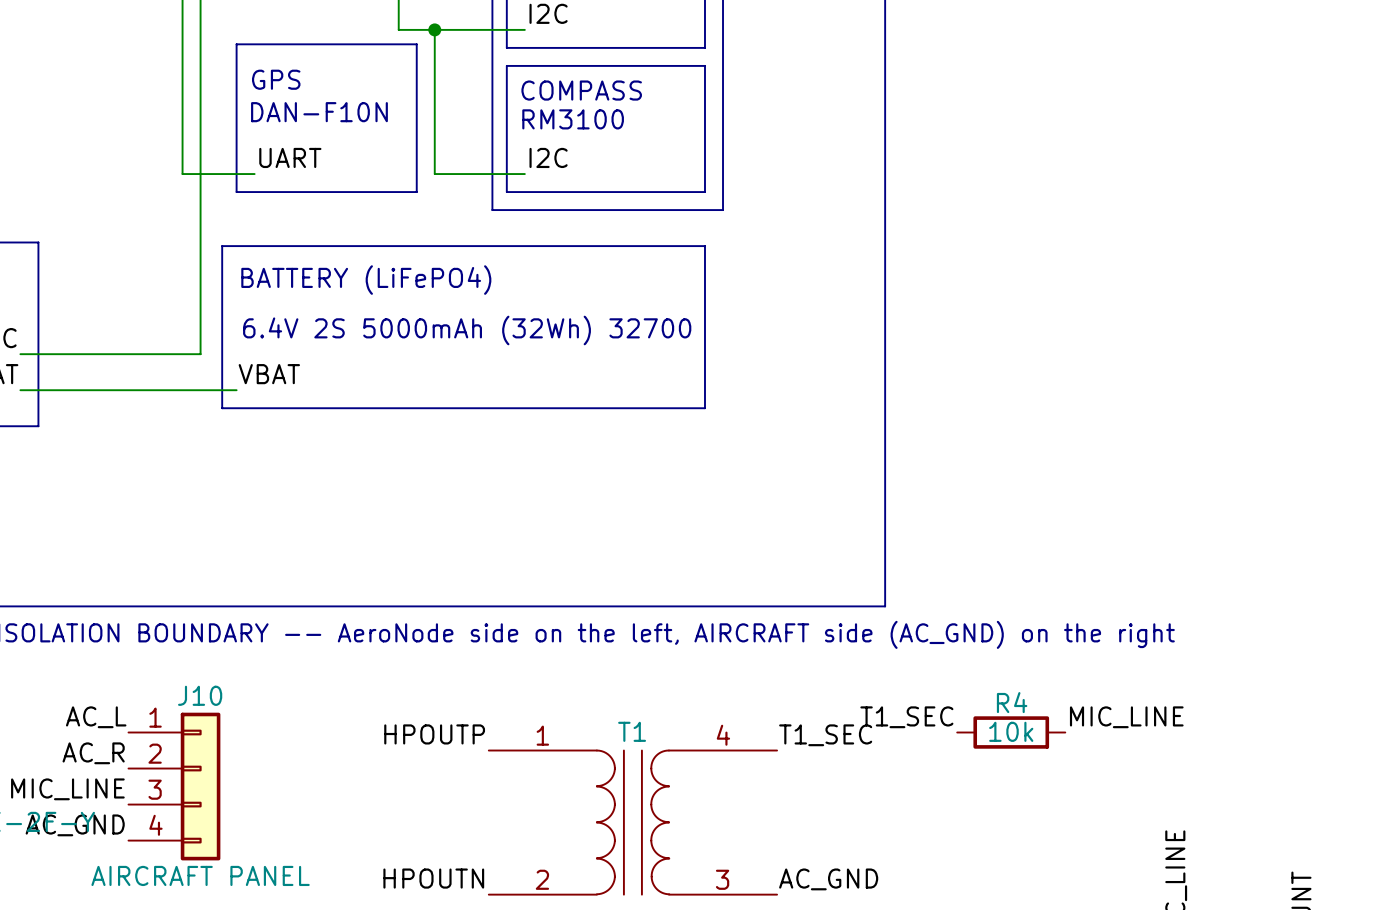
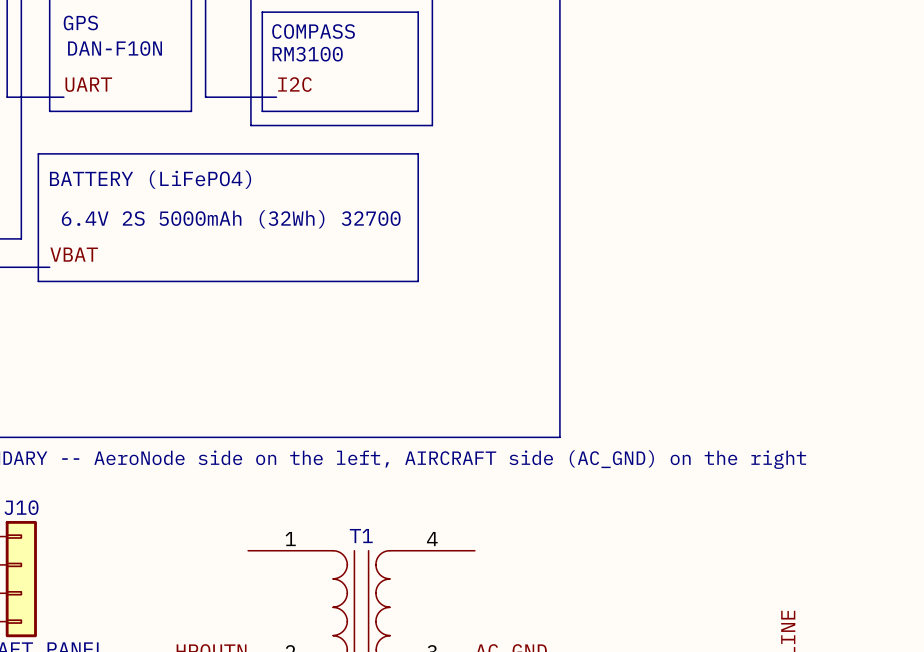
label: T1_SEC (906, 717) -> none
label: MIC_LINE (1126, 717) -> none
R4: 10k (1011, 732) -> none
label: HPOUTP (434, 734) -> none
label: T1_SEC (825, 735) -> none

